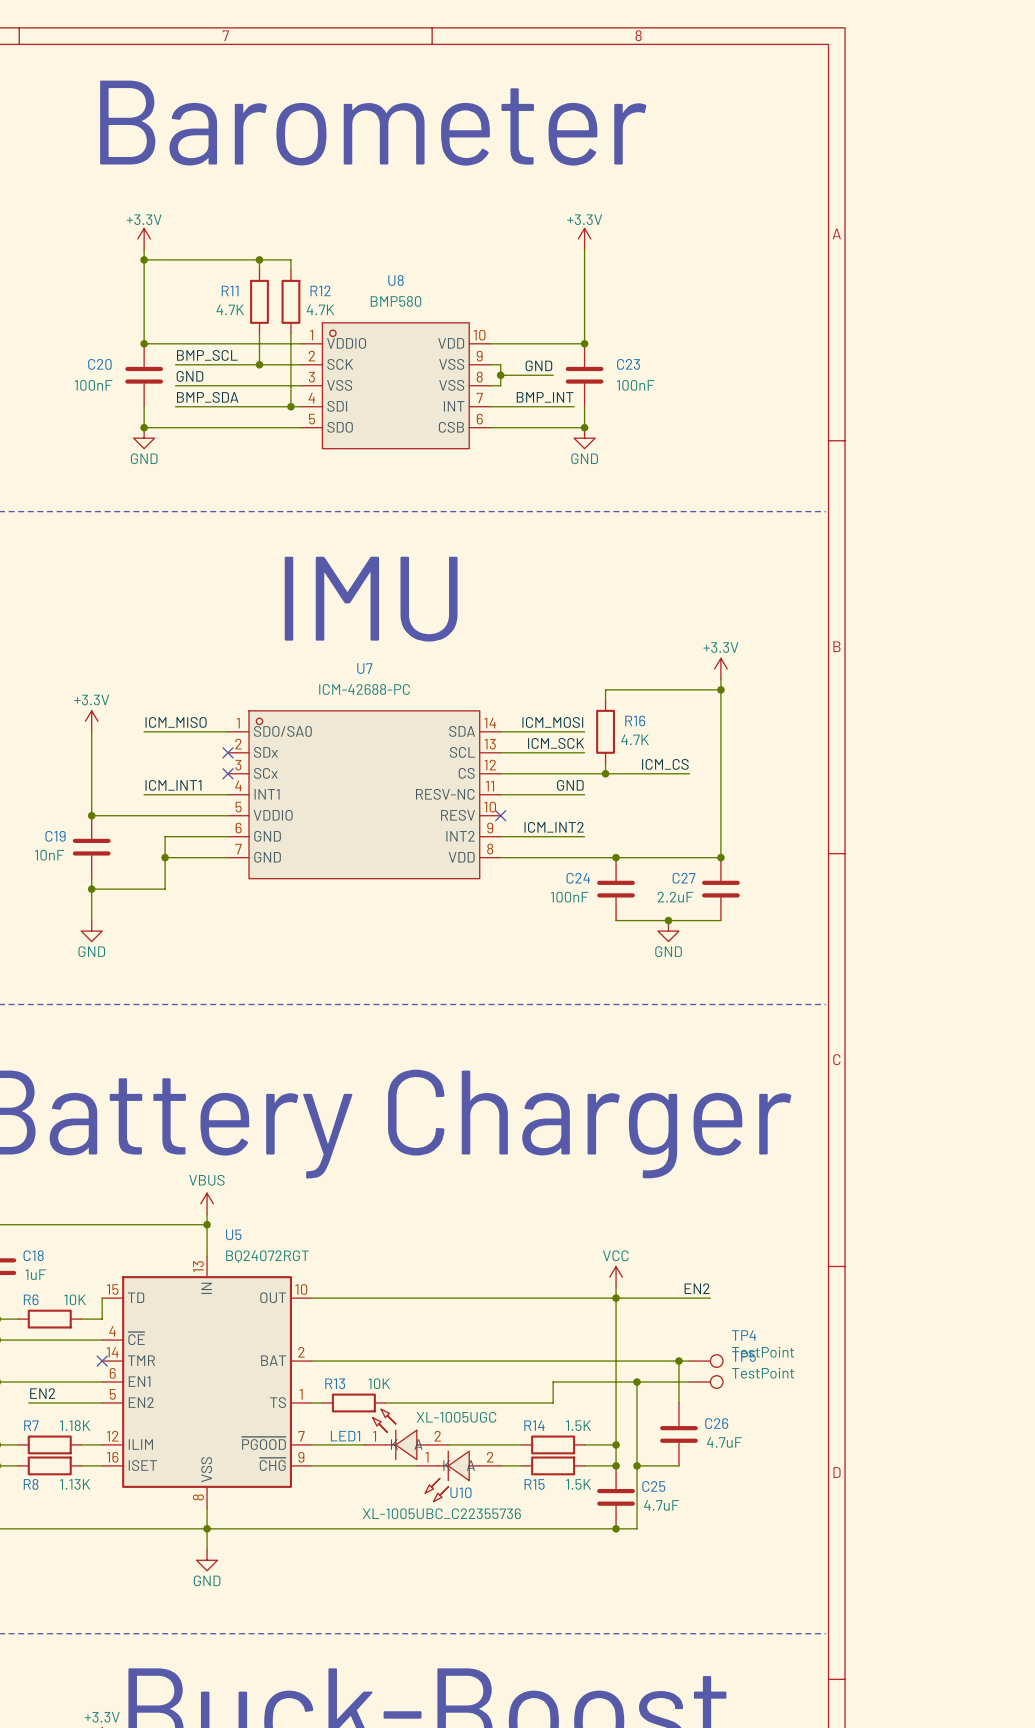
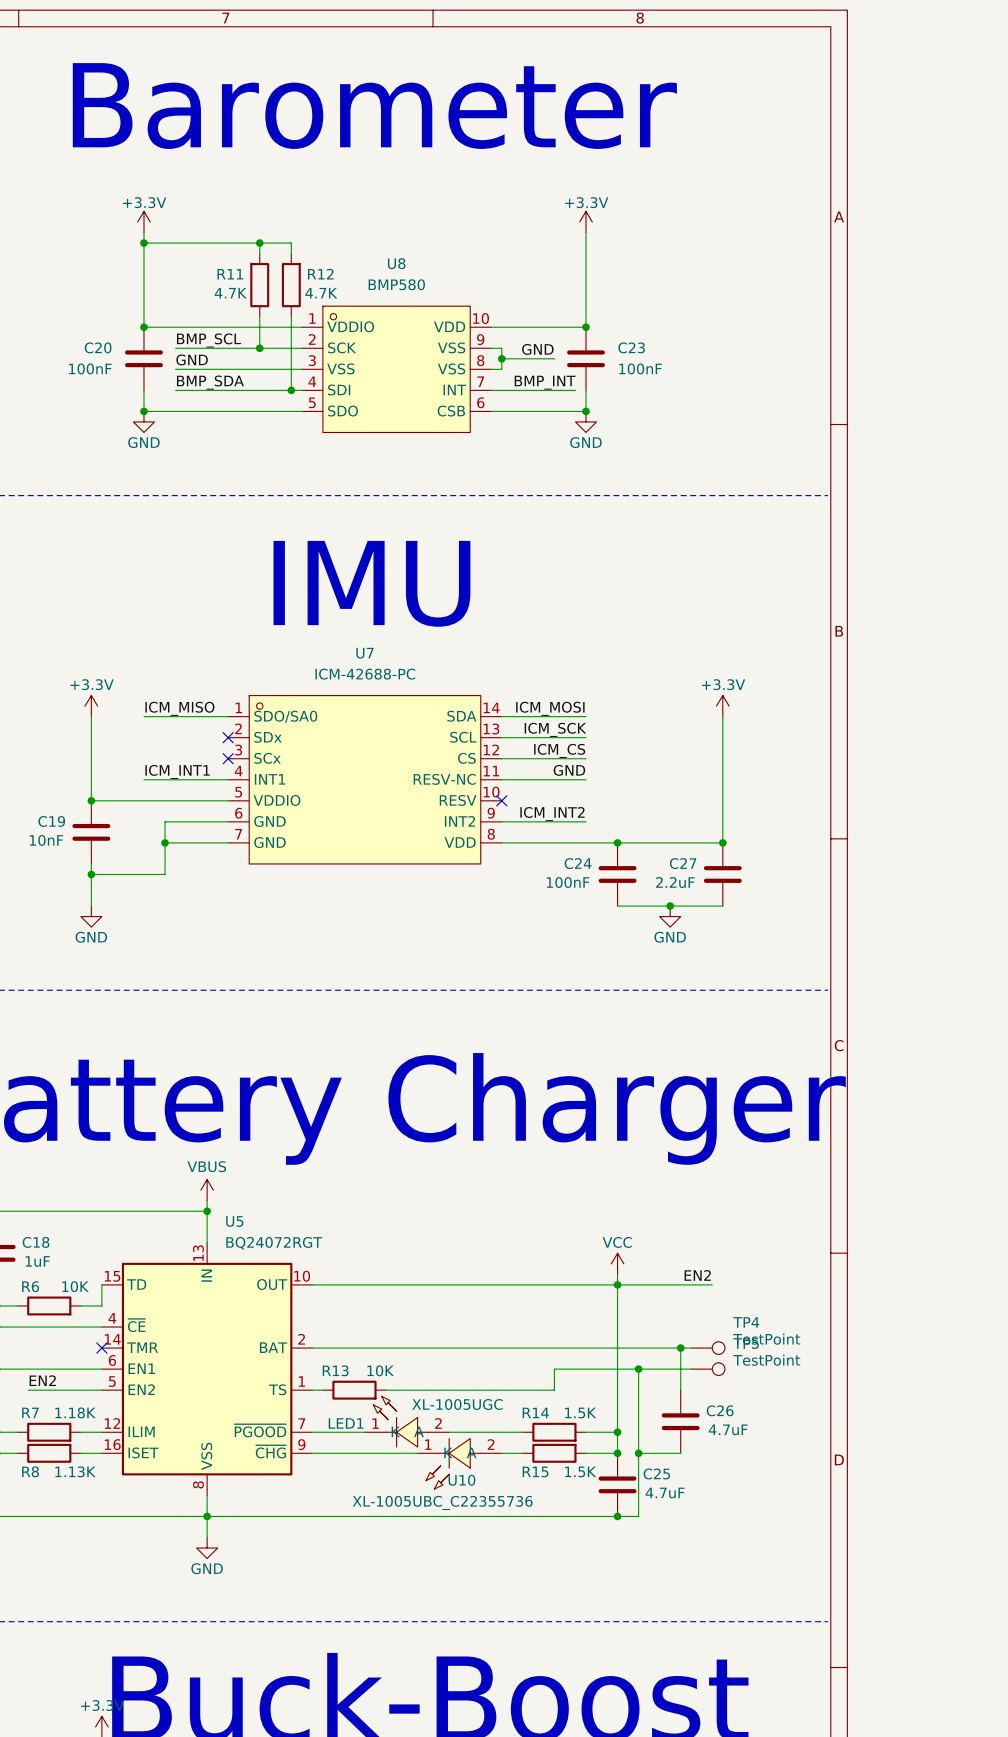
power symbol position: +3.3V (720, 668) -> +3.3V (722, 706)
wire: (720, 679) (720, 731) -> none
wire: (720, 689) (605, 689) (605, 700) -> none
junction: (720, 689) -> none
R16: 4.7K (605, 731) -> none
wire: (605, 763) (605, 773) -> none
label position: ICM_CS (665, 764) -> ICM_CS (559, 750)
wire: (584, 773) (689, 773) -> none
junction: (605, 773) -> none

